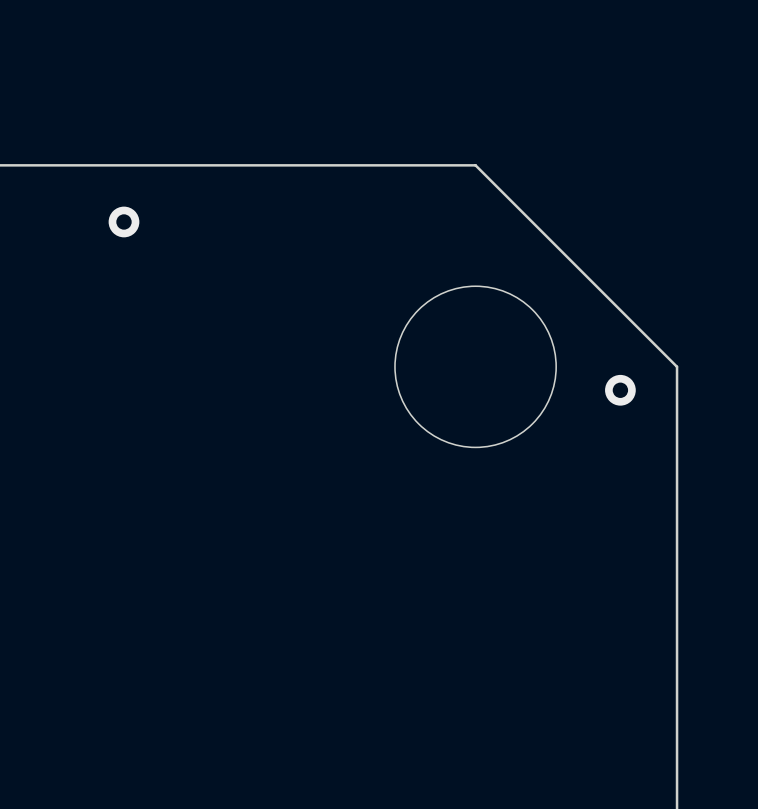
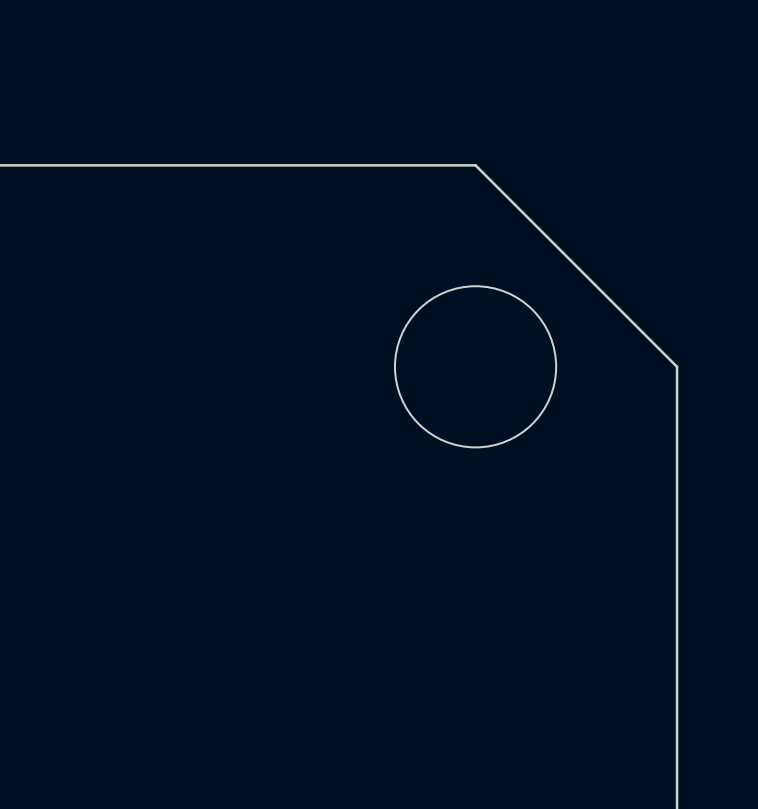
via: (123, 221) -> none
via: (620, 390) -> none

